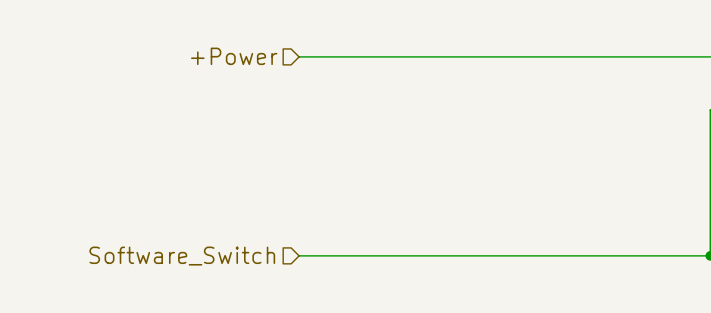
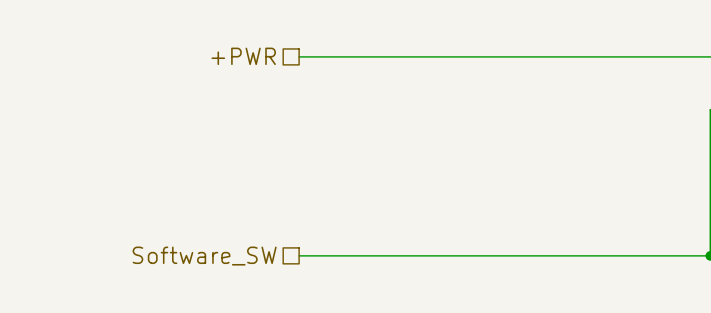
hierarchical label shape: input (234, 56) -> passive (243, 56)
hierarchical label: +Power (234, 56) -> +PWR (243, 56)
hierarchical label shape: input (182, 256) -> passive (204, 256)
hierarchical label: Software_Switch (182, 256) -> Software_SW (204, 256)

